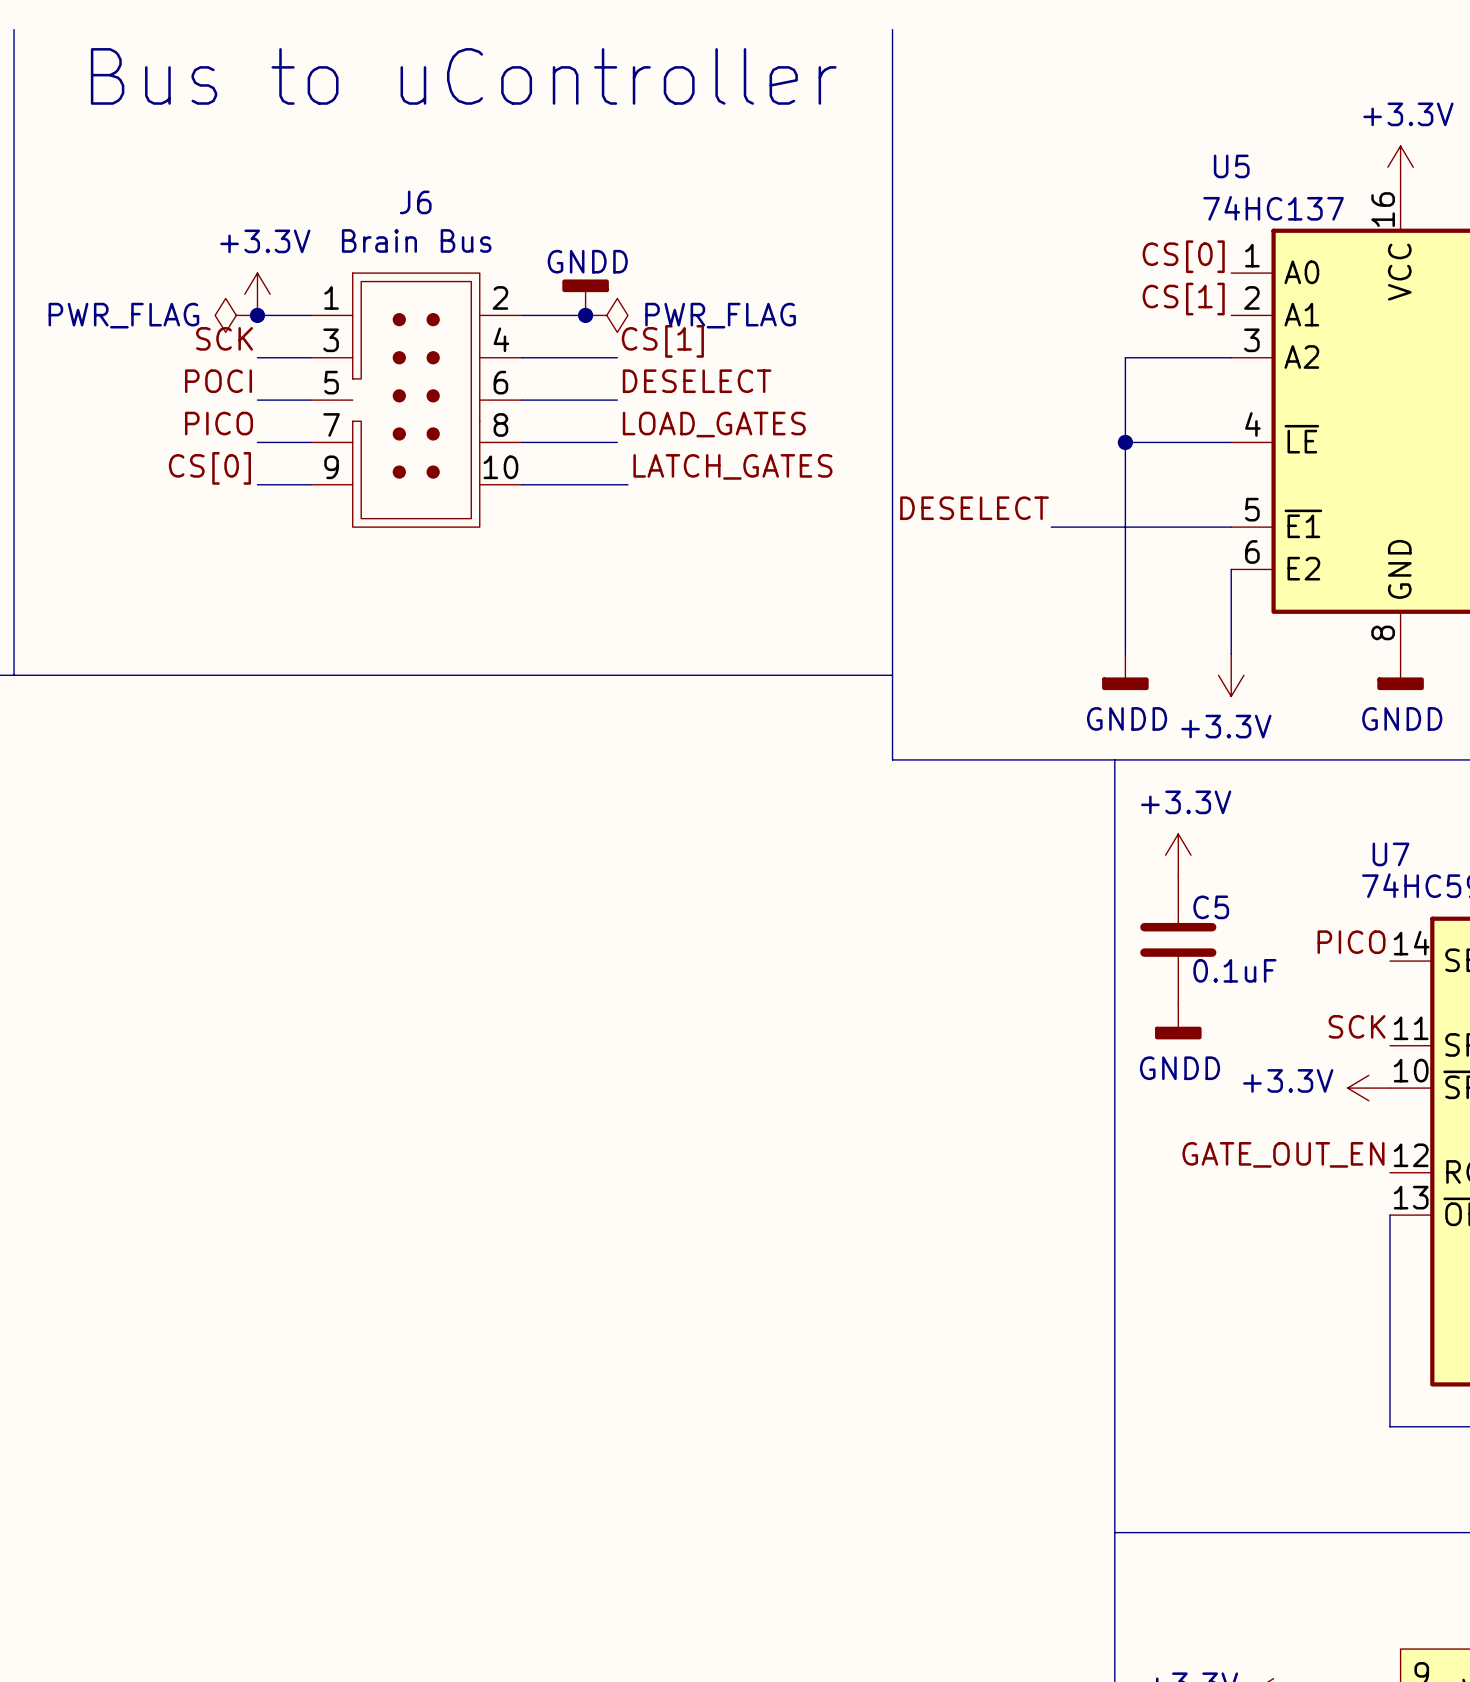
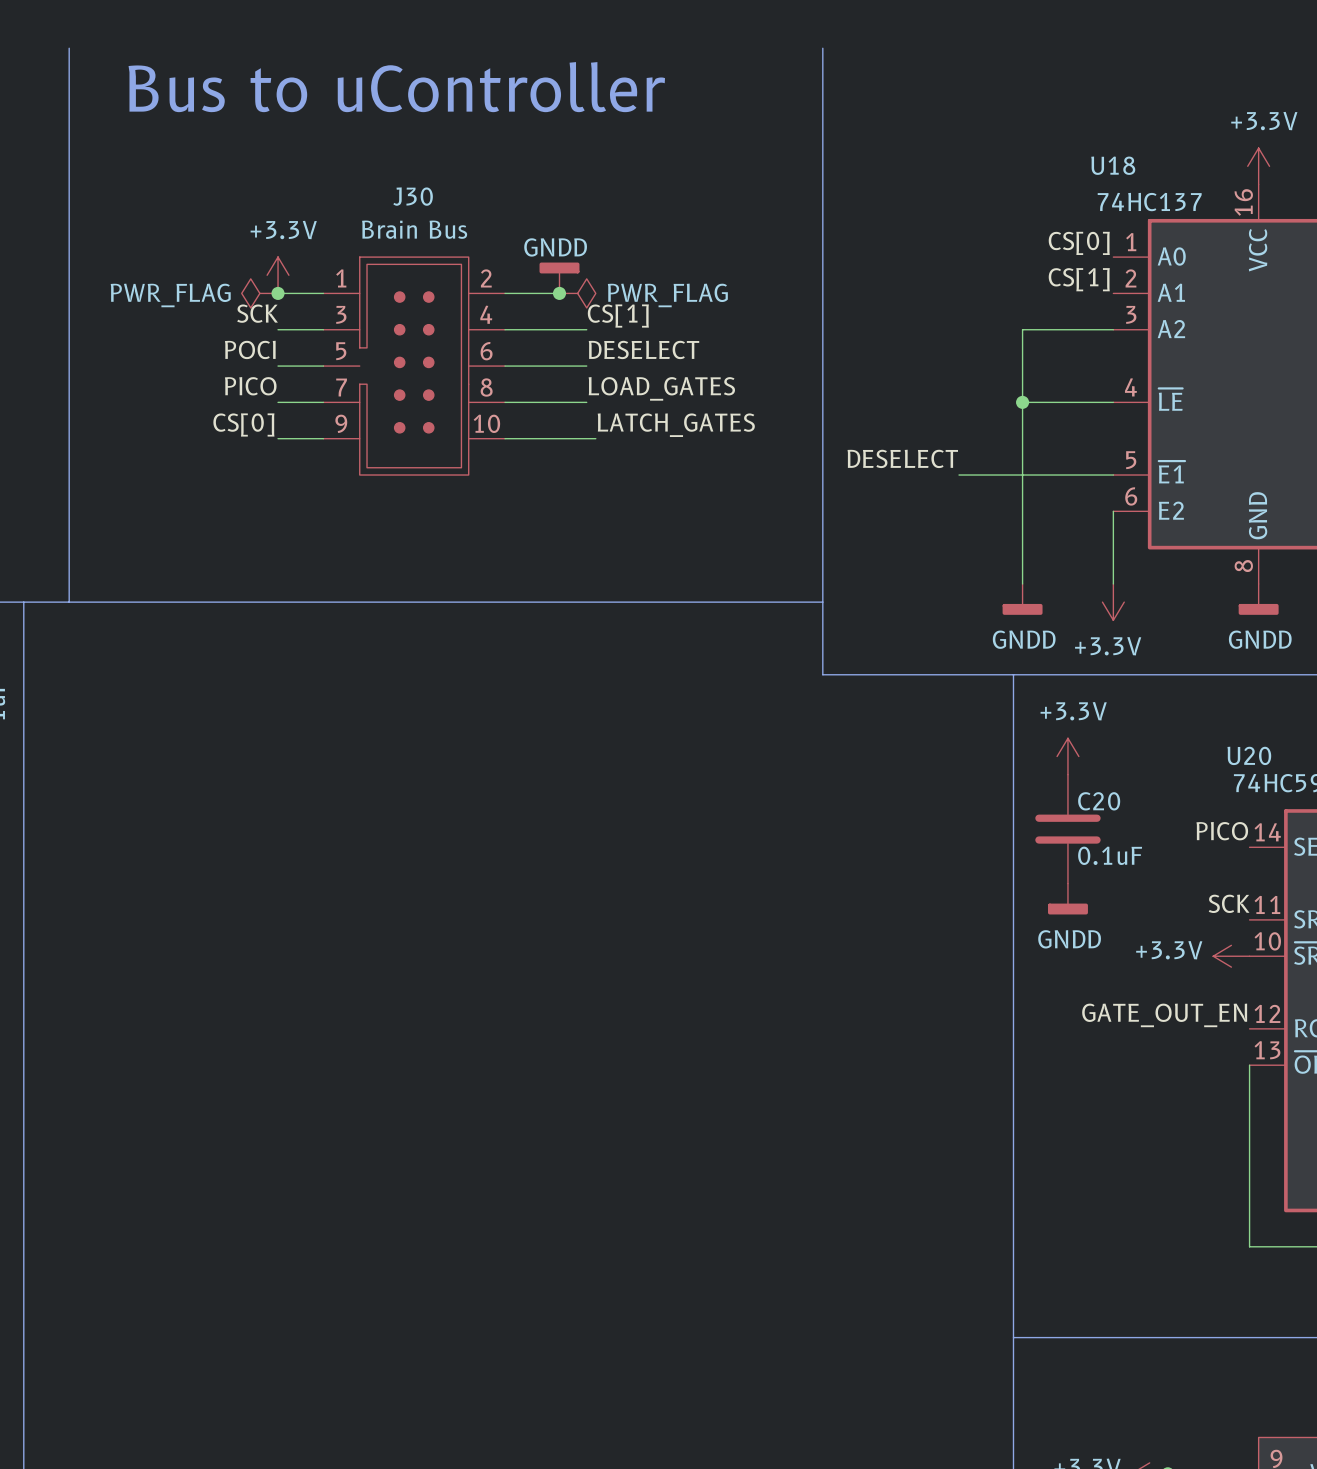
U5 name: U5 (1231, 166) -> U18 (1113, 165)
J6 name: J6 (415, 202) -> J30 (413, 196)
U7 name: U7 (1391, 854) -> U20 (1249, 755)
C5 name: C5 (1211, 907) -> C20 (1099, 801)

